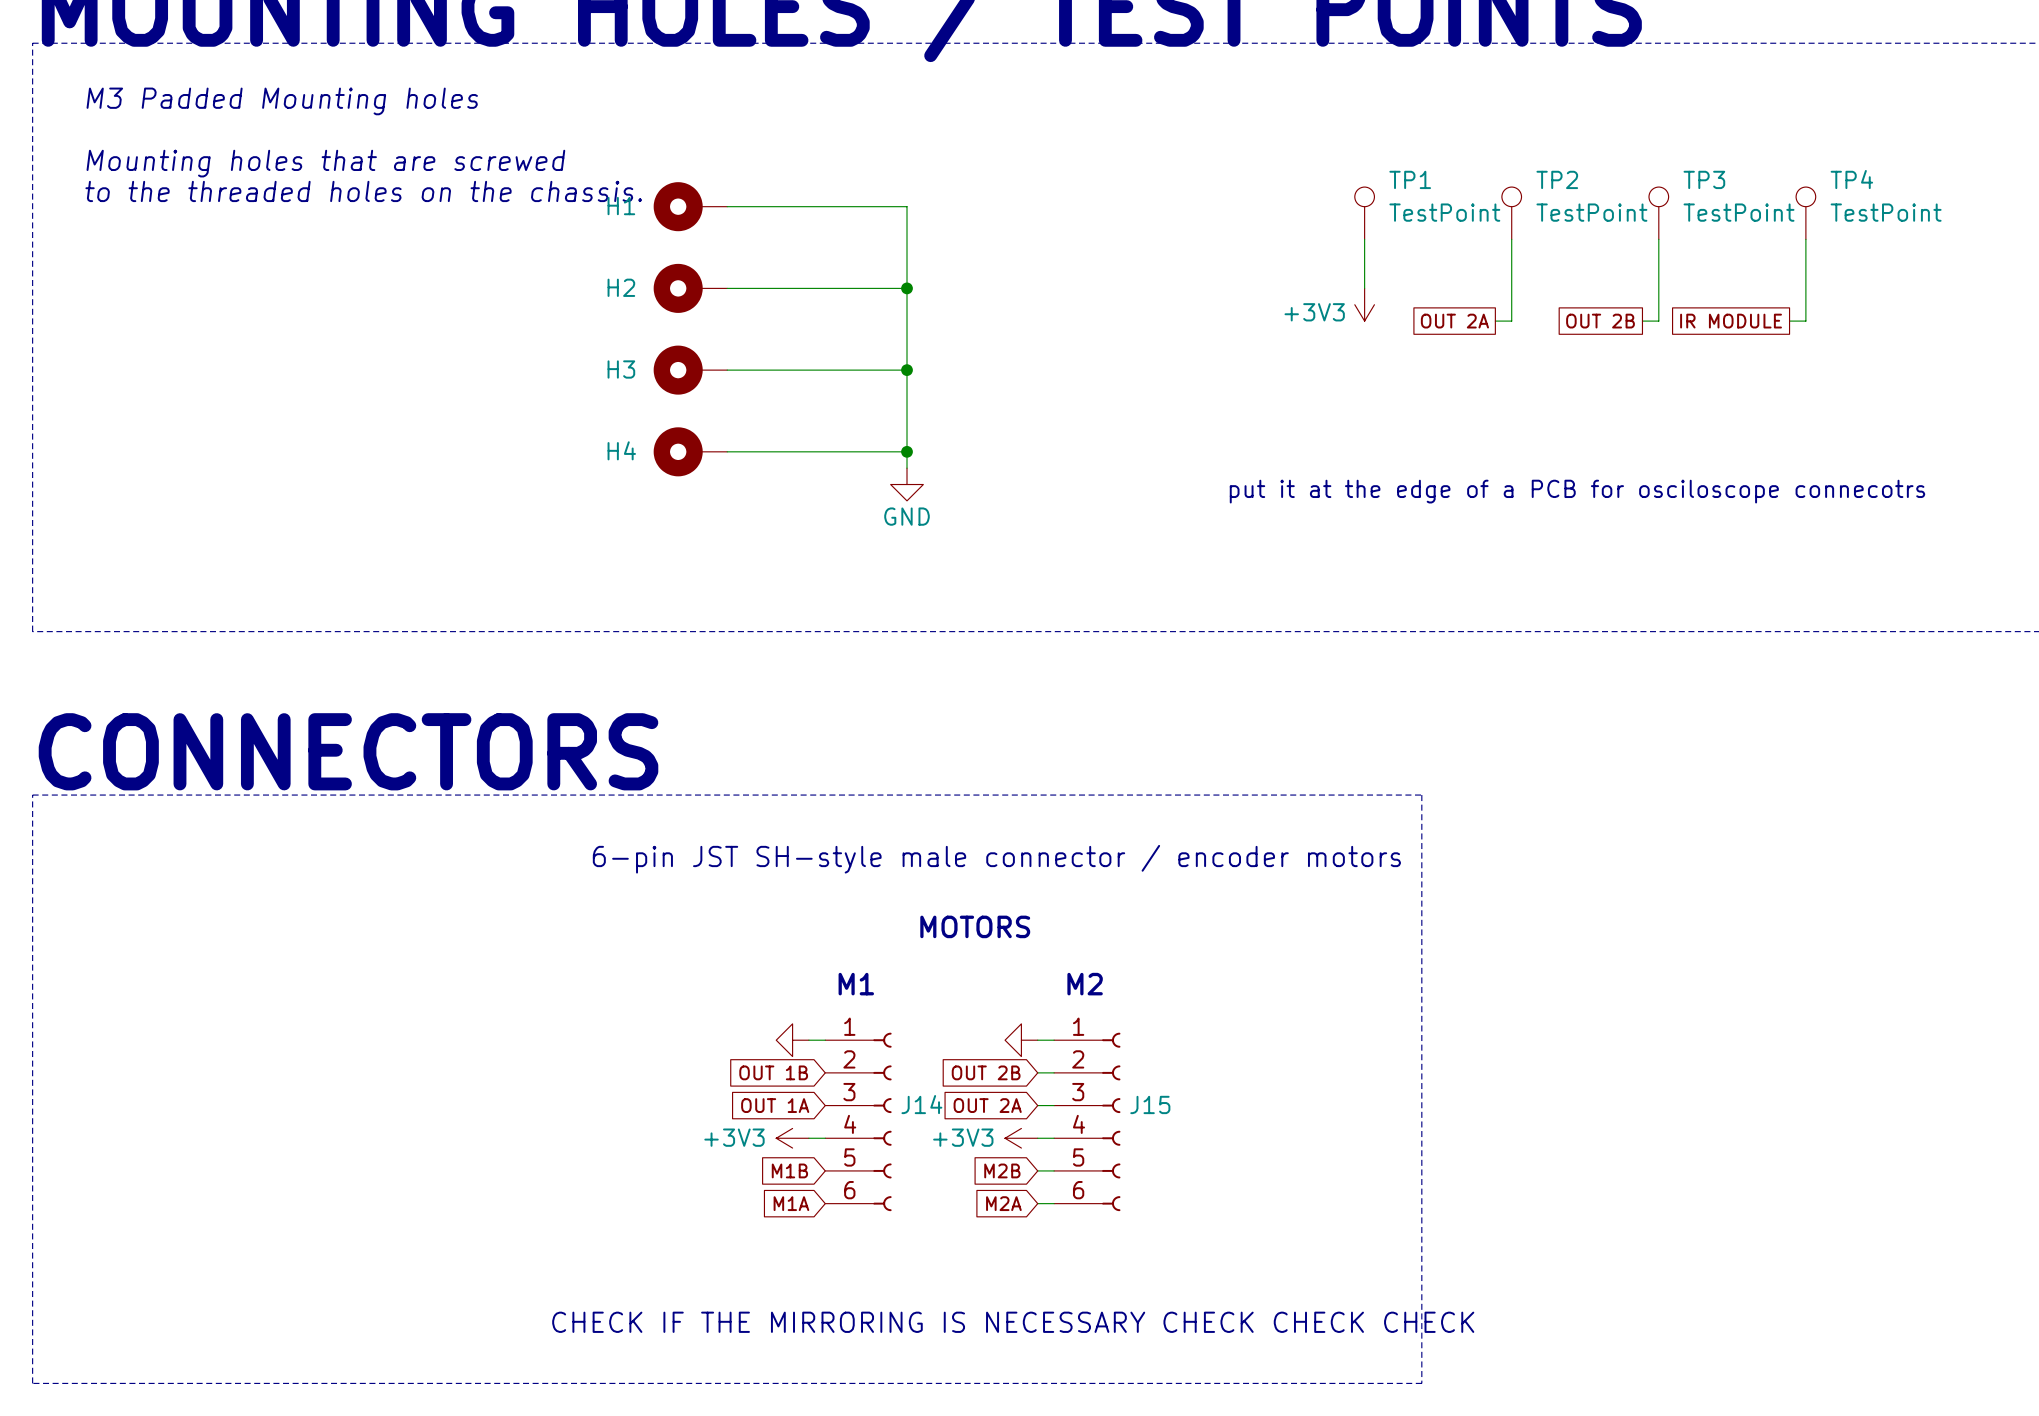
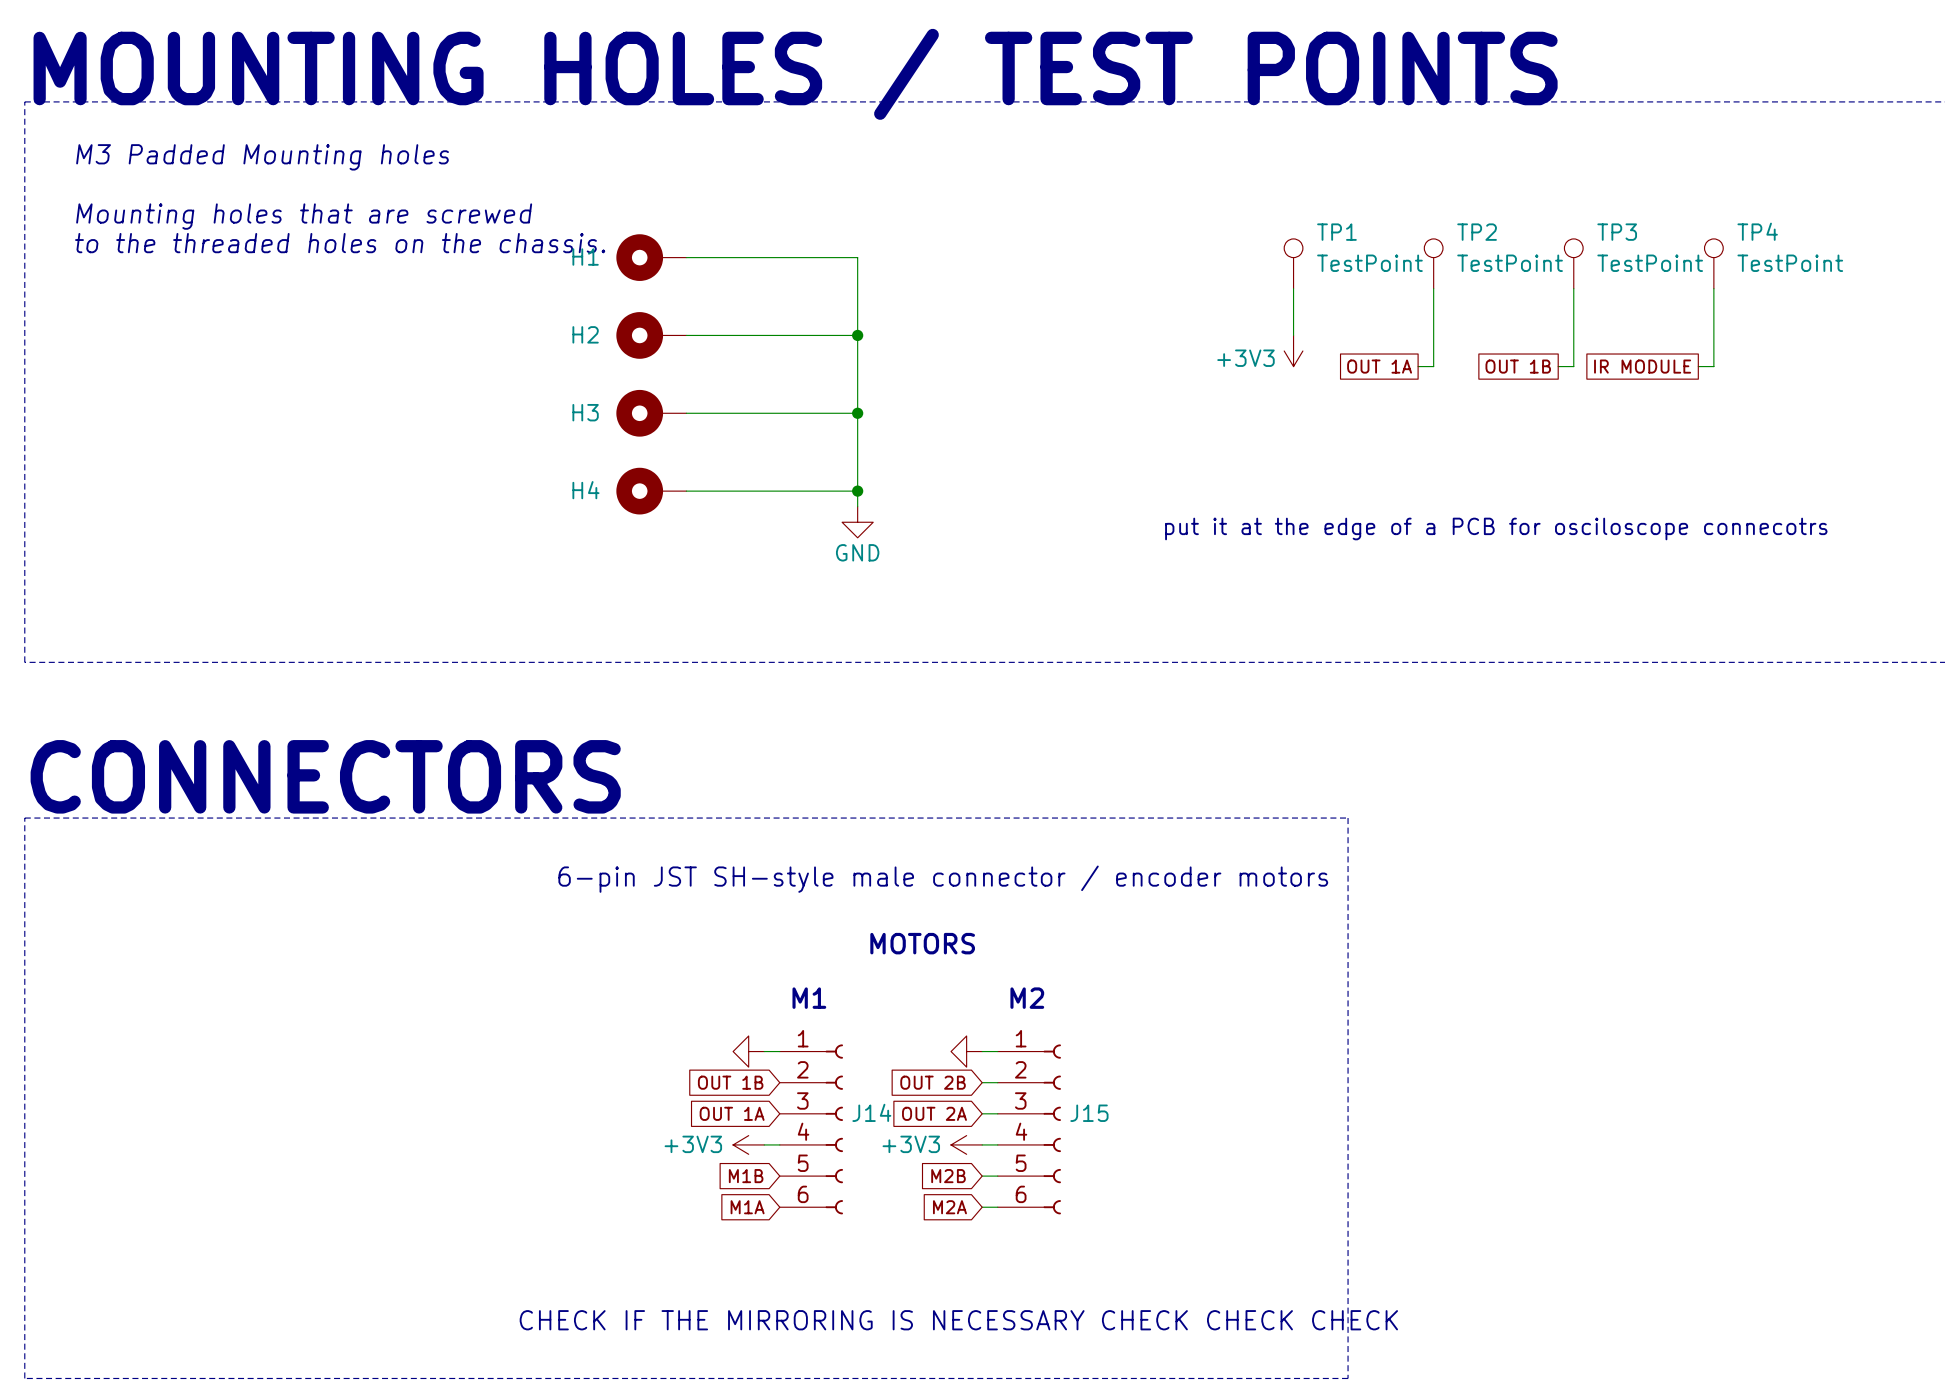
global label: OUT 2A (1454, 321) -> OUT 1A (1379, 366)
global label: OUT 2B (1600, 321) -> OUT 1B (1518, 366)

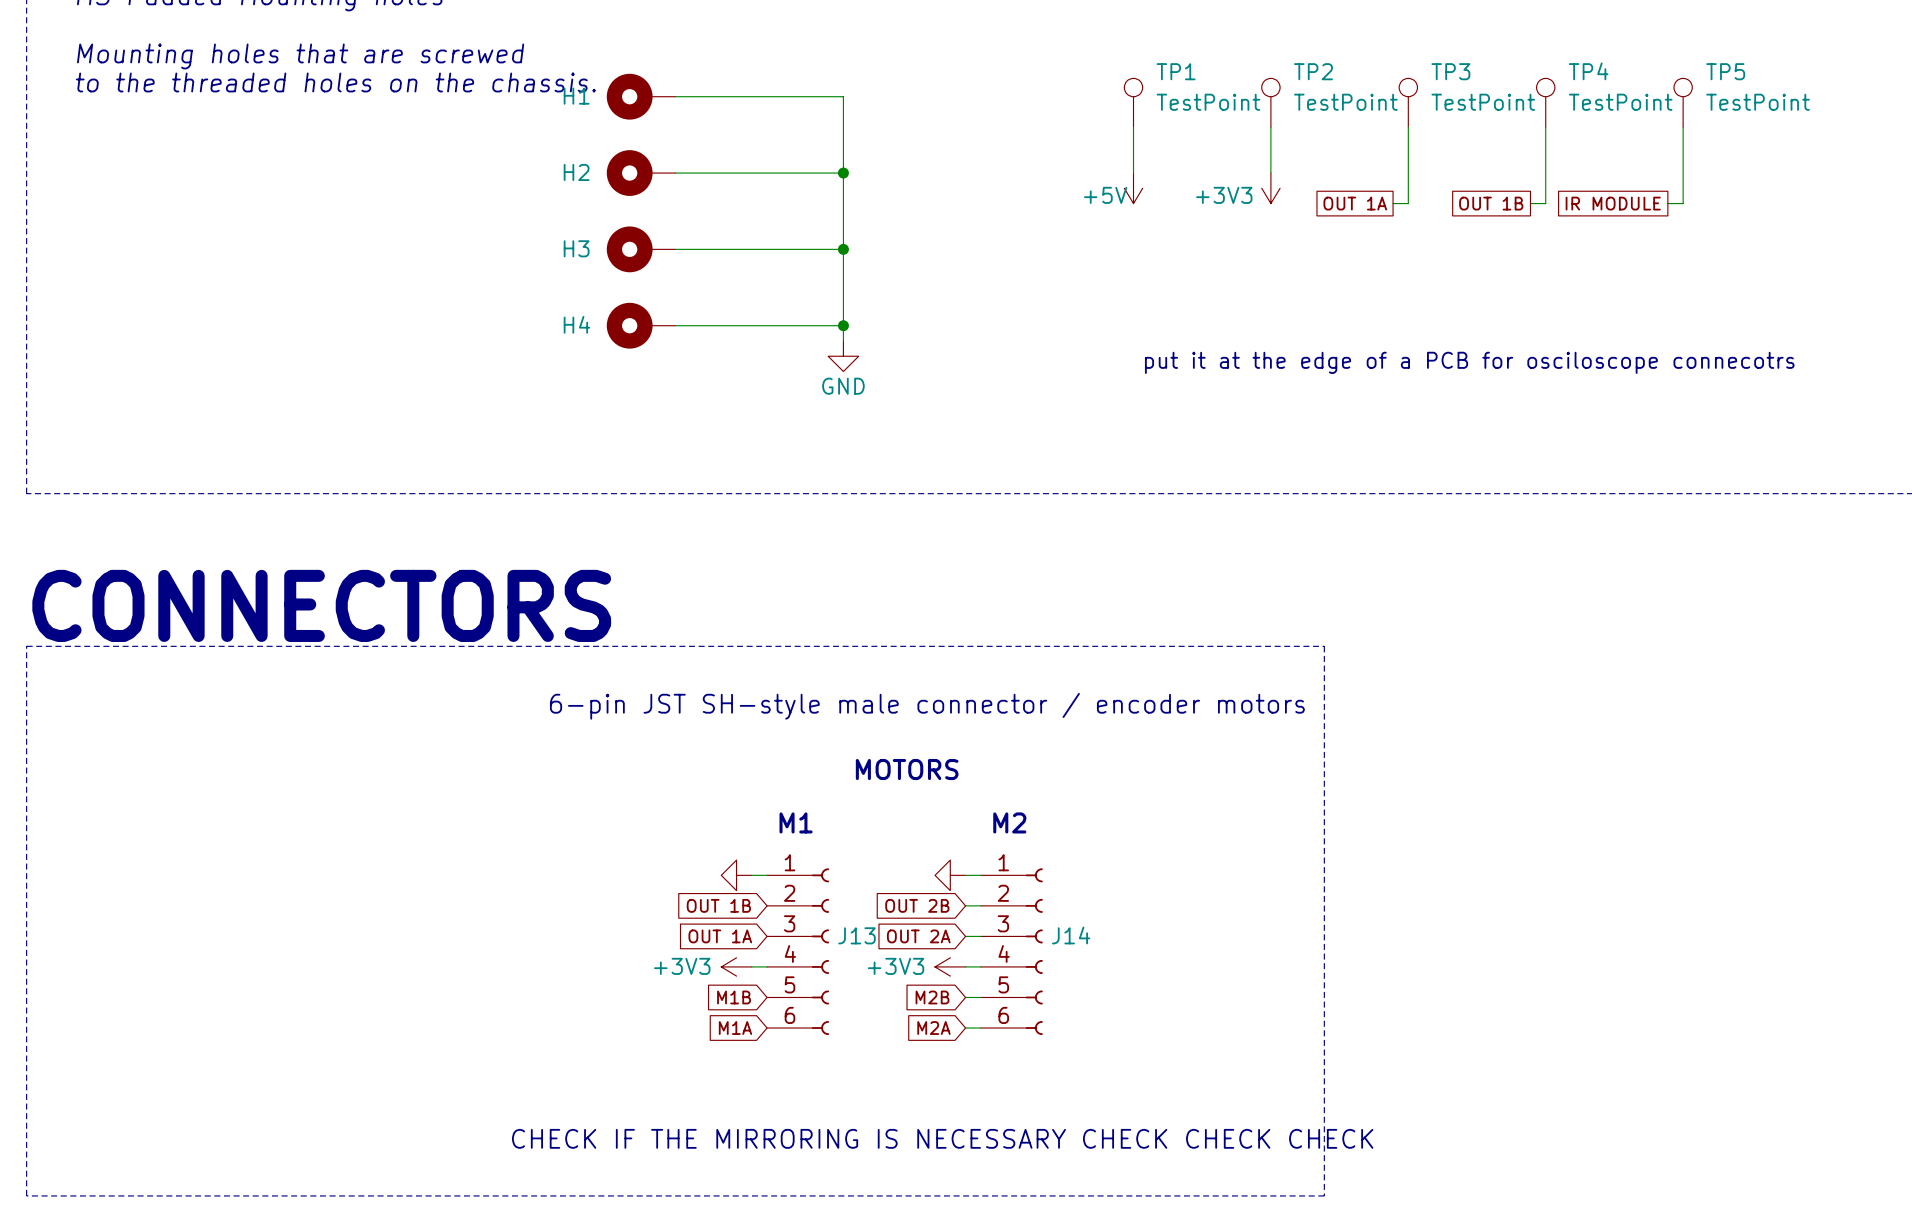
TP4 name: TP4 (1757, 231) -> TP5 (1725, 71)
TP1 name: TP1 (1336, 232) -> TP2 (1313, 71)
TP2 name: TP2 (1477, 232) -> TP3 (1450, 71)
TP3 name: TP3 (1617, 232) -> TP4 (1588, 71)
TP1: none -> TestPoint (1133, 102)
wire: none -> (1133, 127) (1133, 173)
power symbol: none -> +5V (1133, 188)
J14 name: J14 (871, 1112) -> J13 (856, 935)
J15 name: J15 (1089, 1113) -> J14 (1071, 935)

